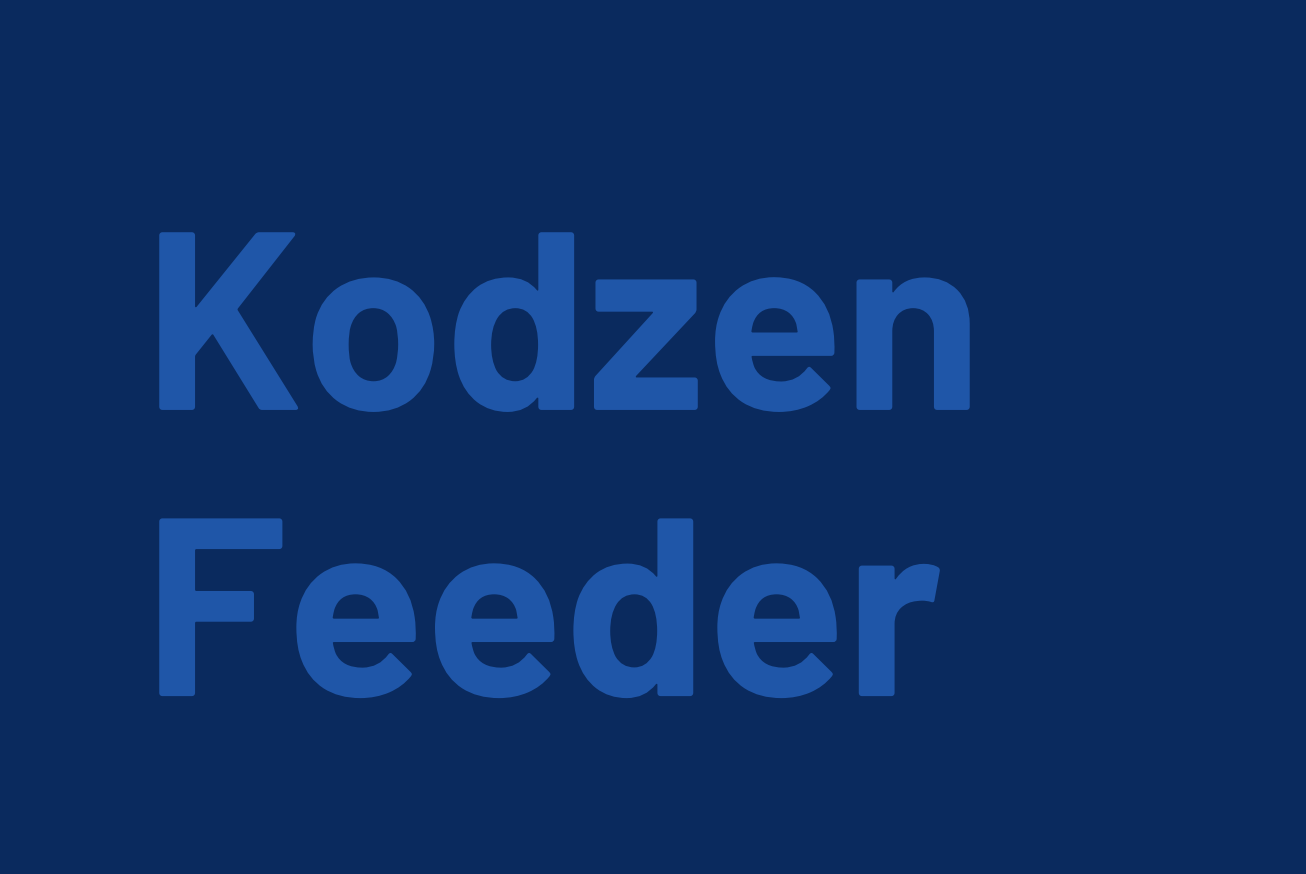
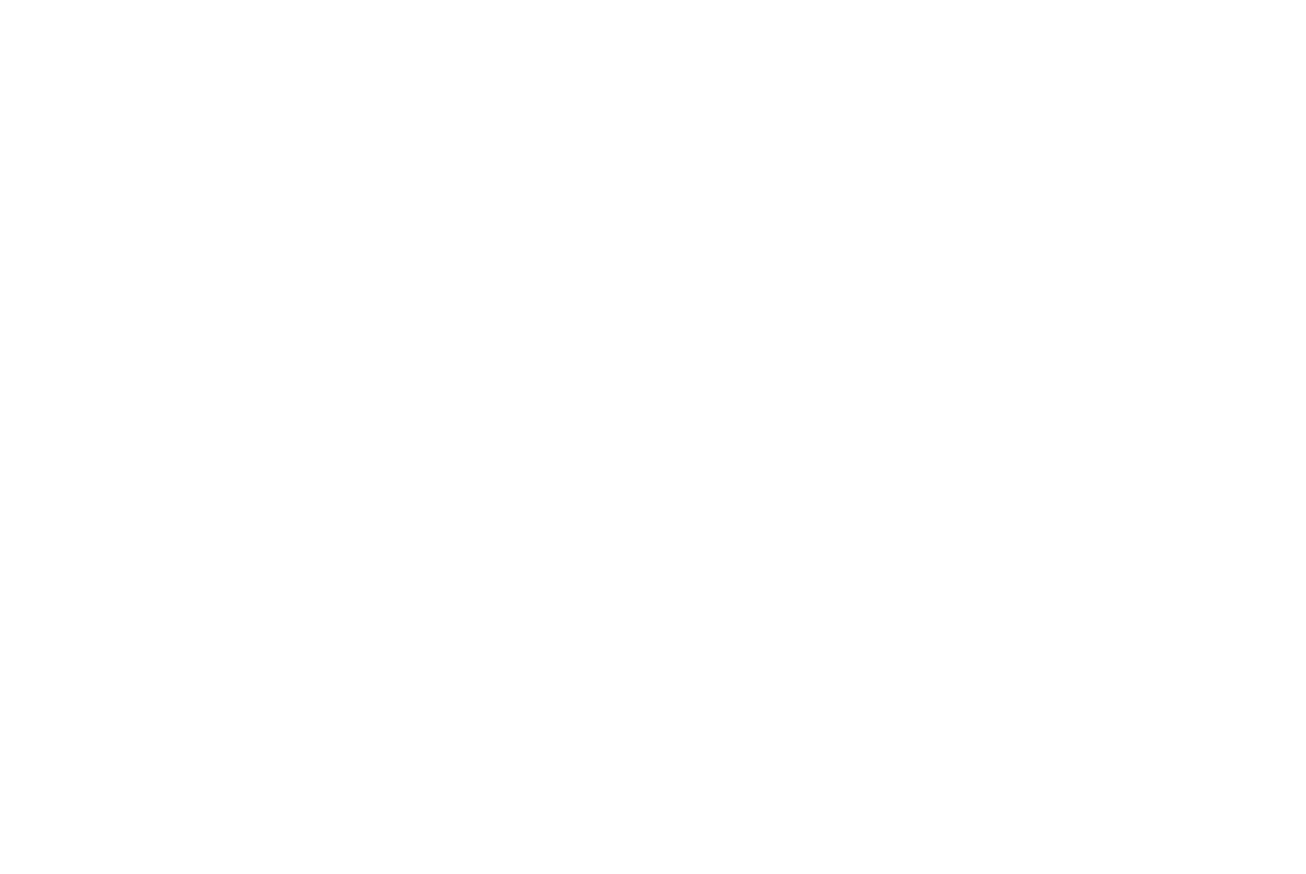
text: Kodzen (564, 322) -> none
text: Feeder (549, 608) -> none

